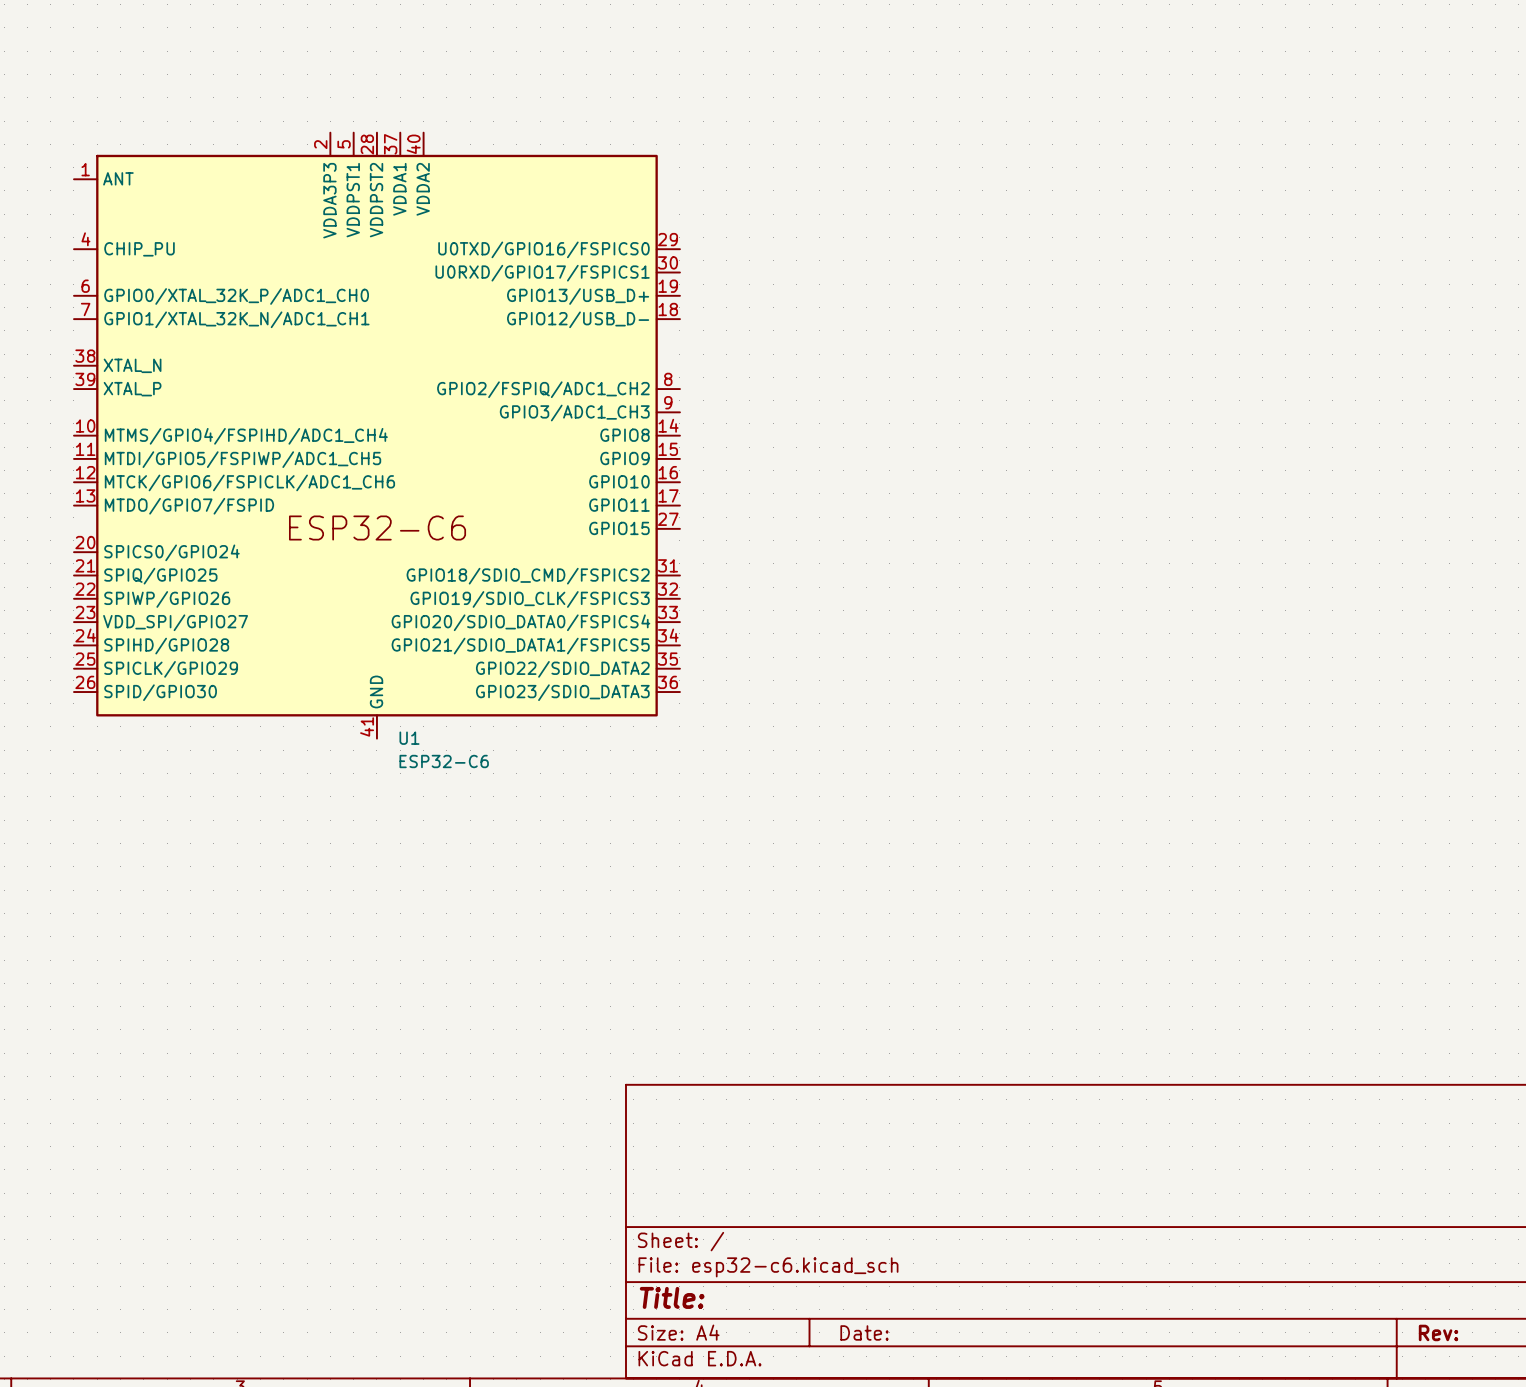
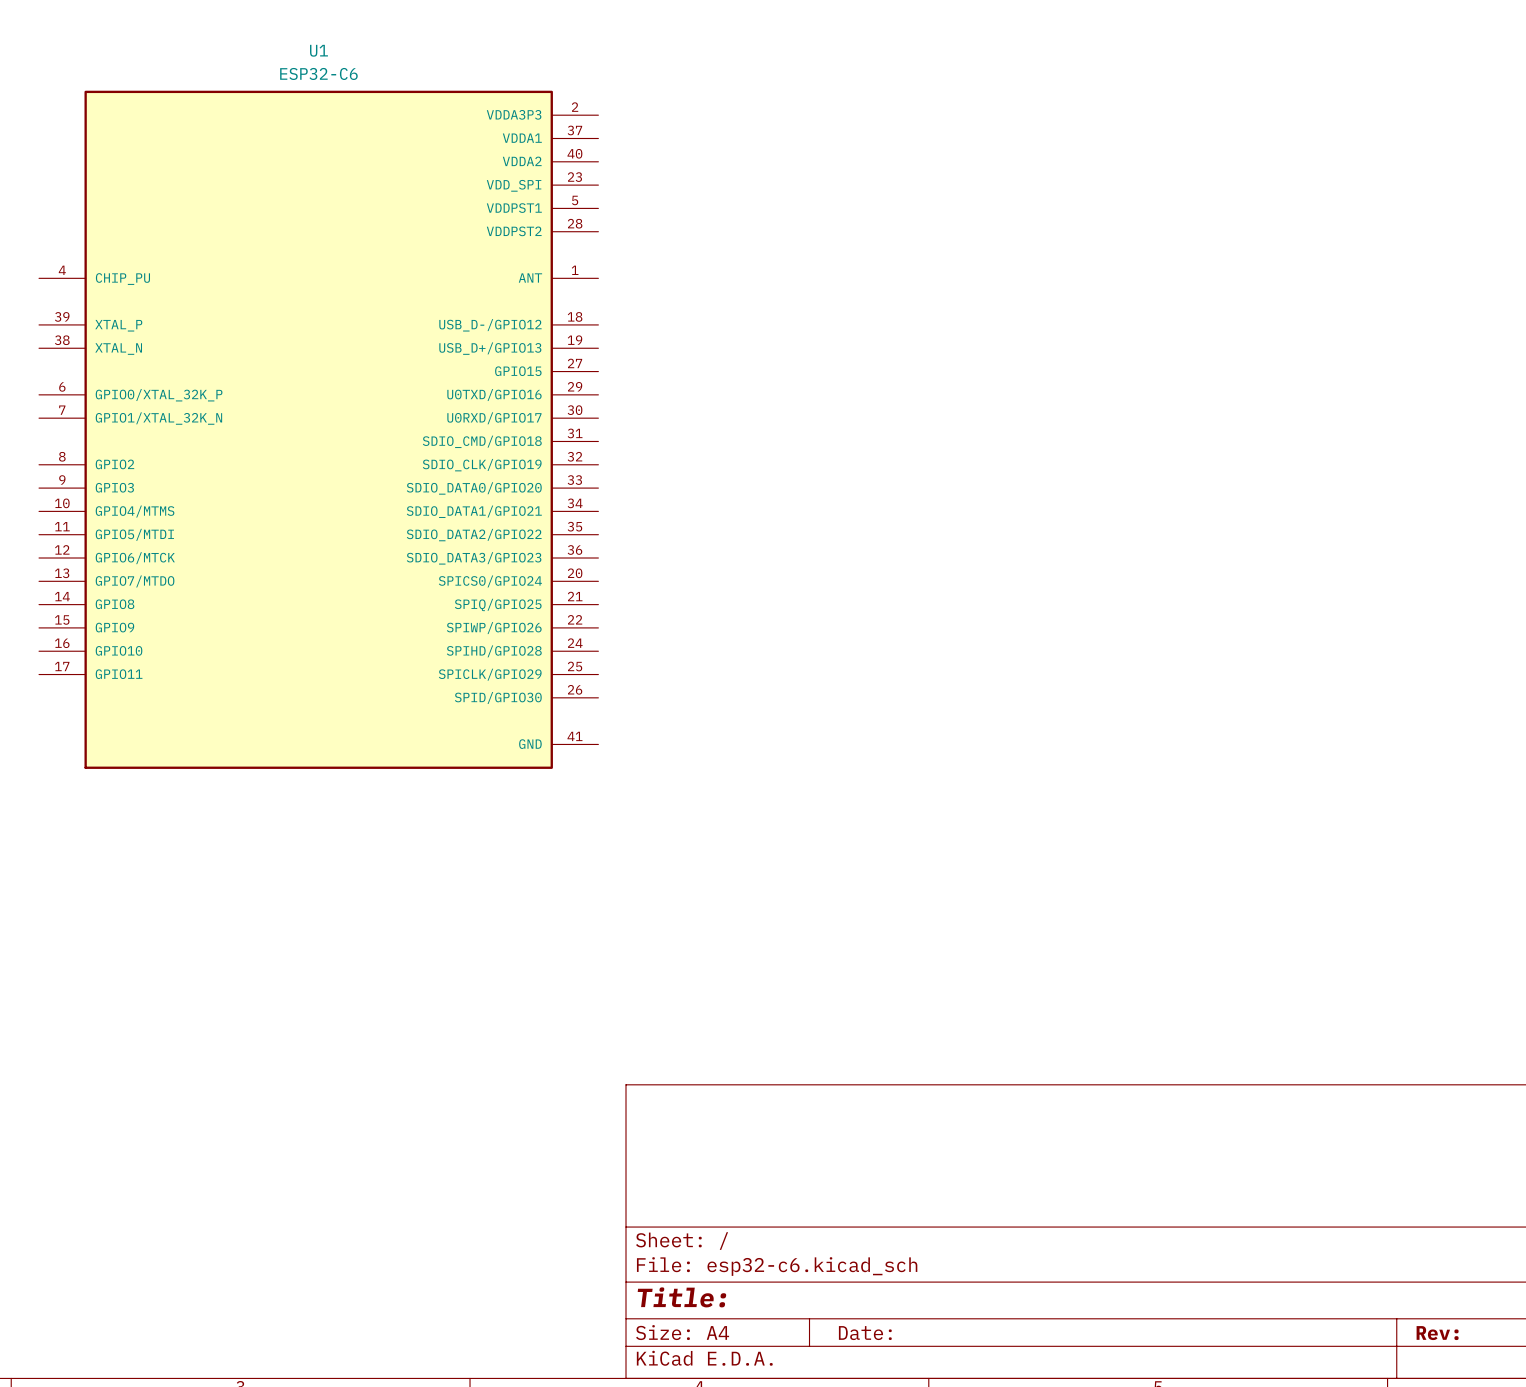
U1 symbol: [73, 132, 680, 739] -> [39, 90, 599, 769]
U1 name position: U1 (409, 738) -> U1 (318, 50)
U1 value position: ESP32-C6 (444, 761) -> ESP32-C6 (318, 73)

